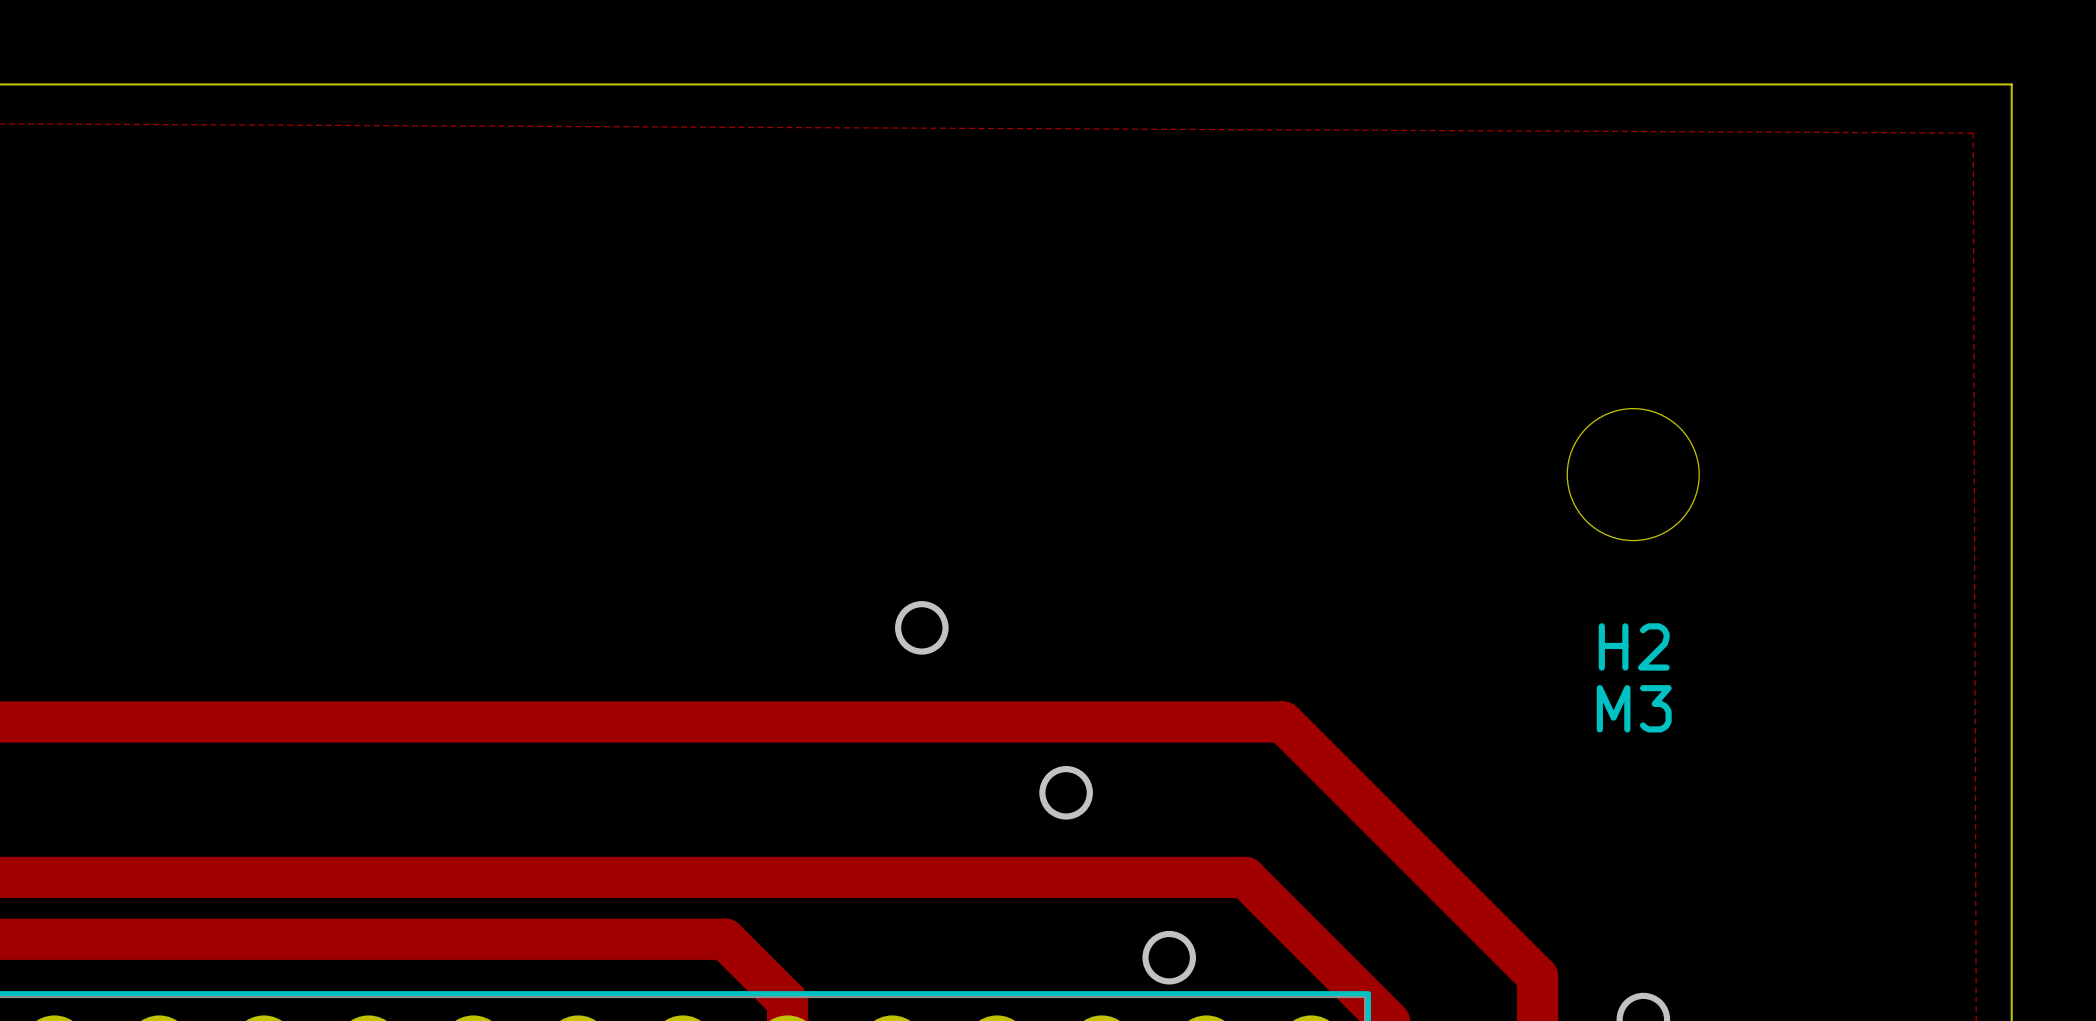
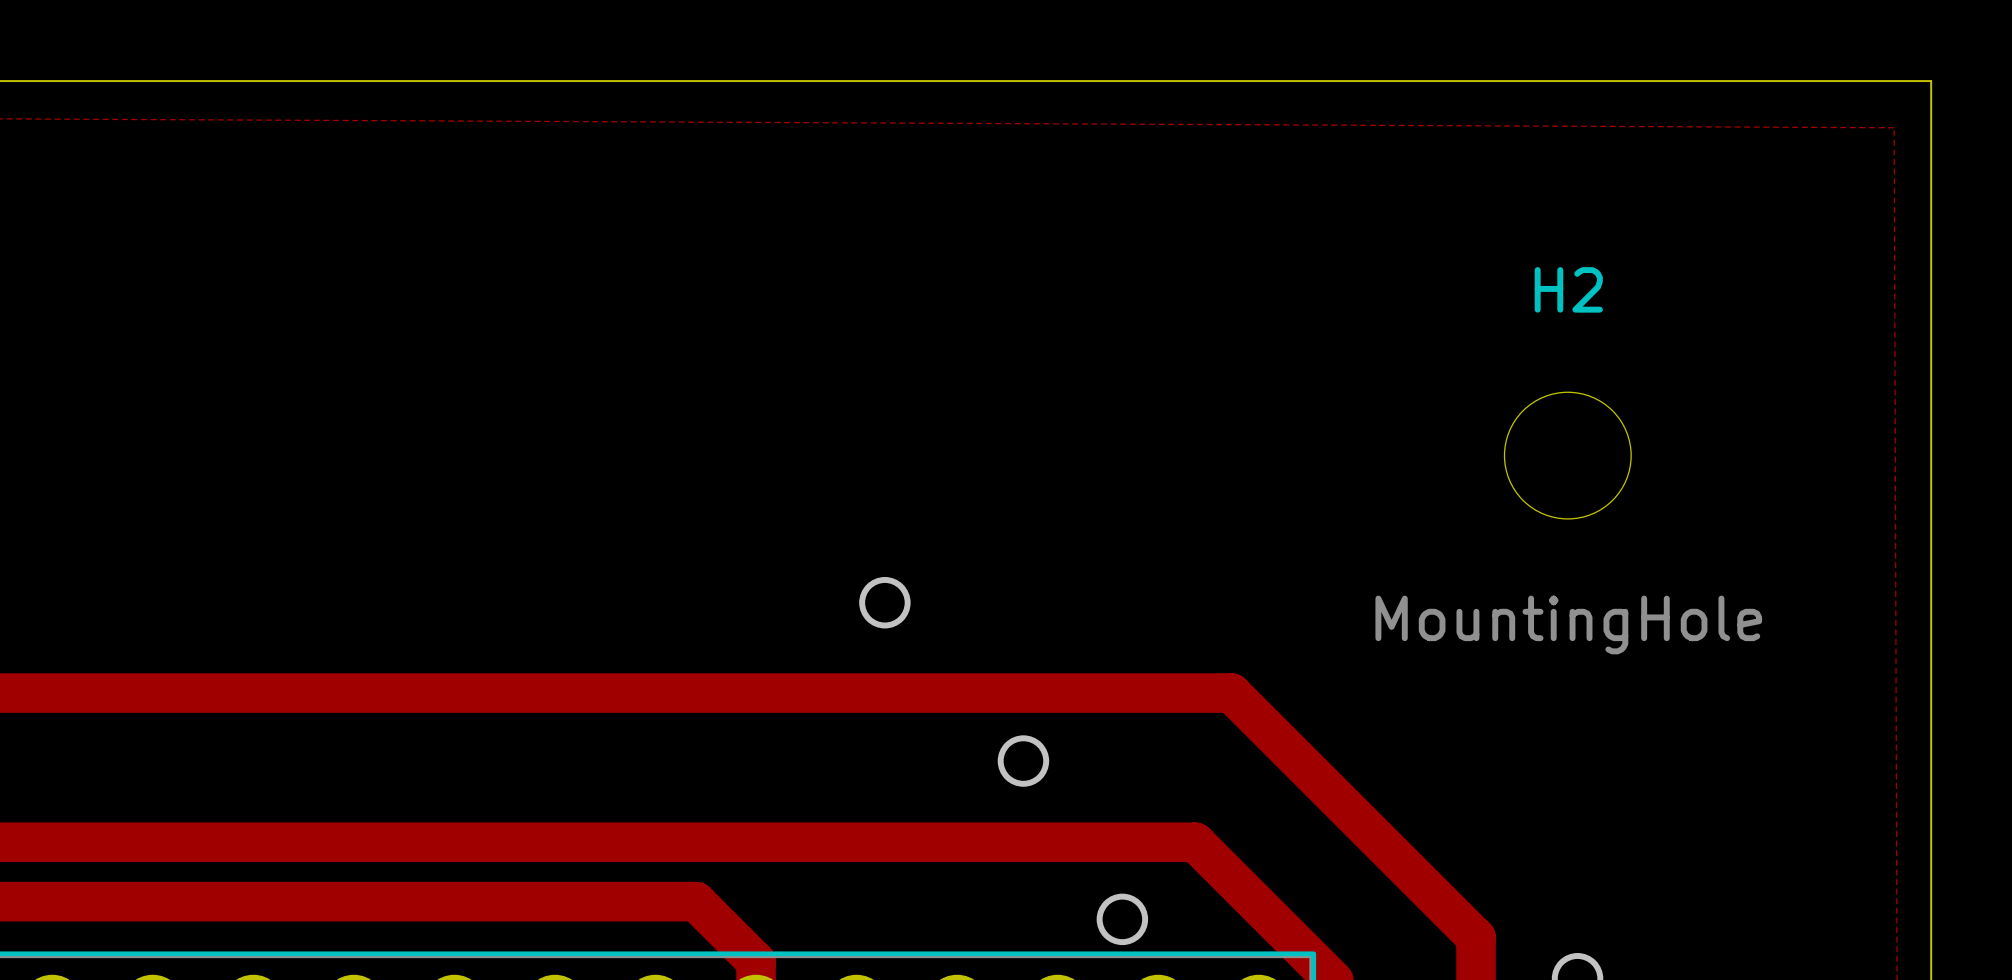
H2 name position: H2 (1634, 646) -> H2 (1568, 289)
H2 value: M3 (1634, 708) -> MountingHole (1568, 624)

